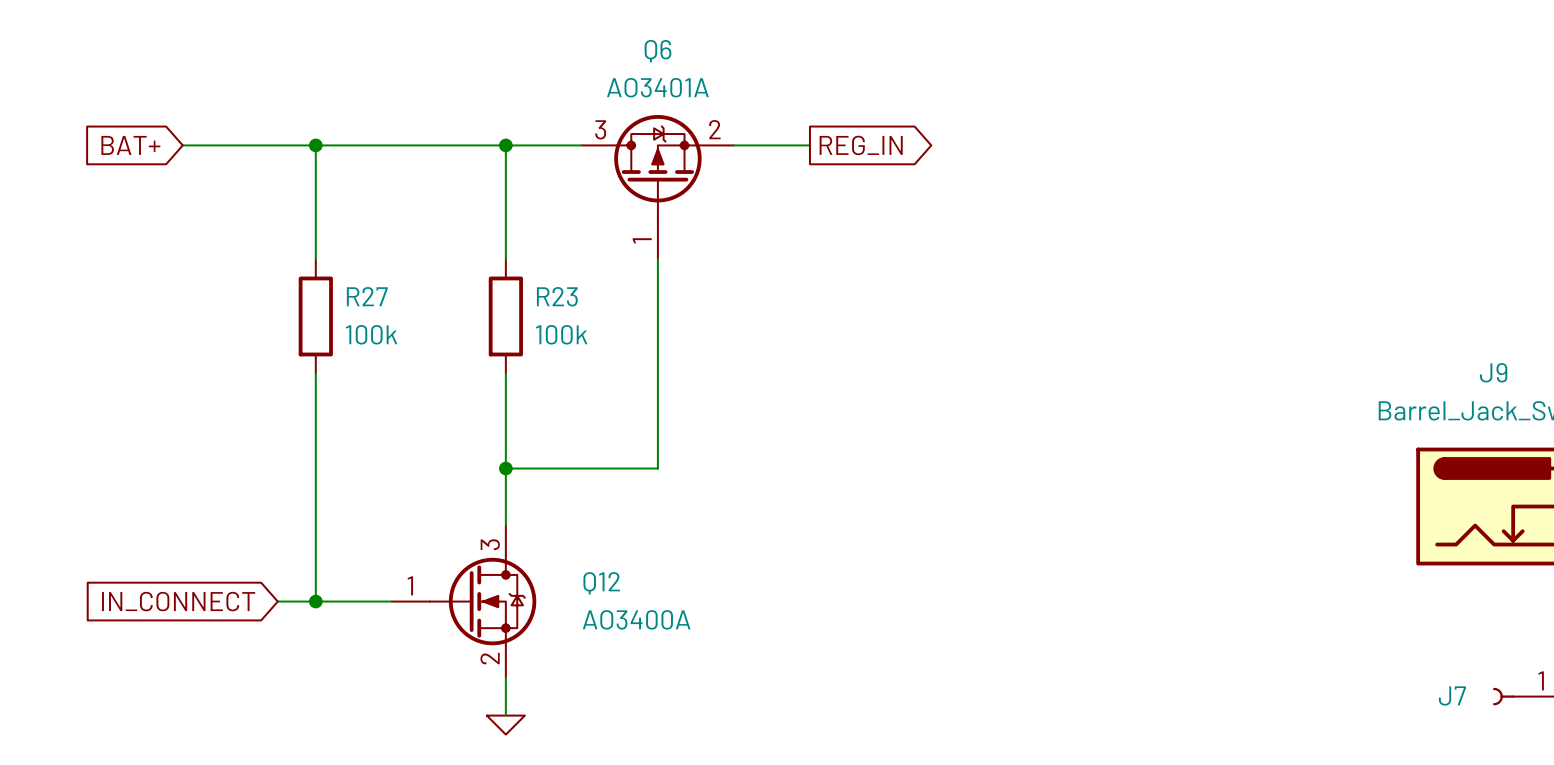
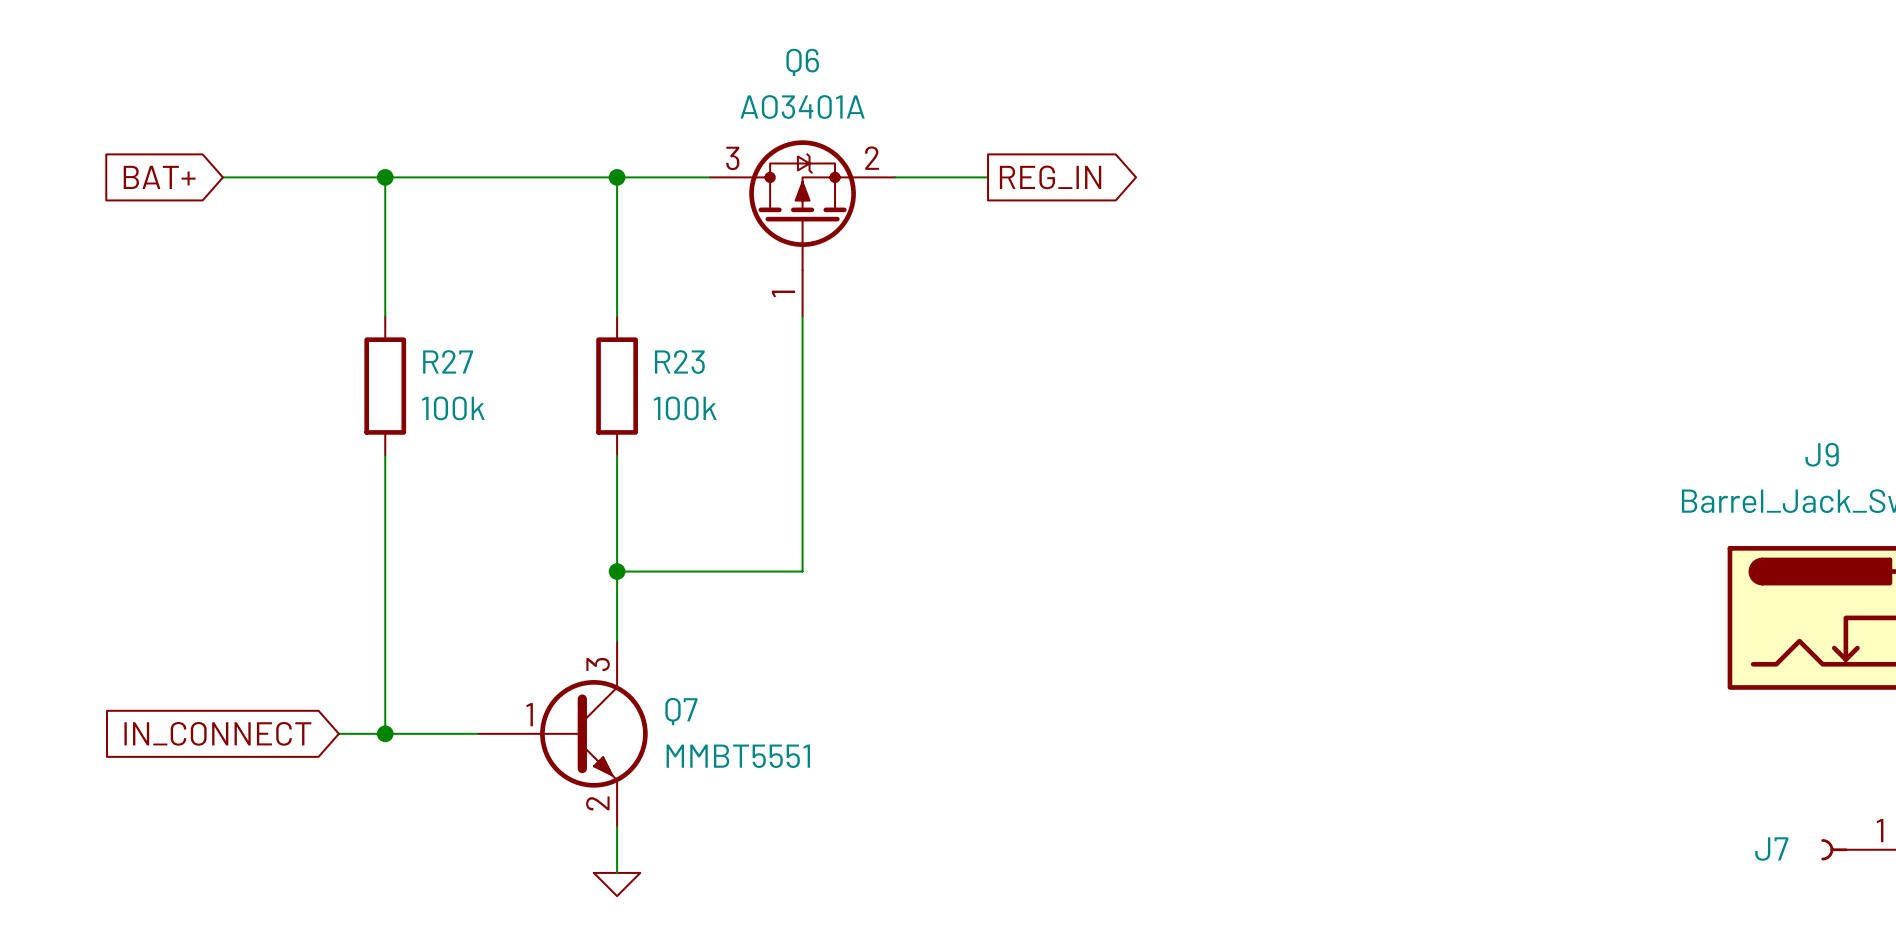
Q7: none -> MMBT5551 (562, 733)
Q12: AO3400A (464, 601) -> none

